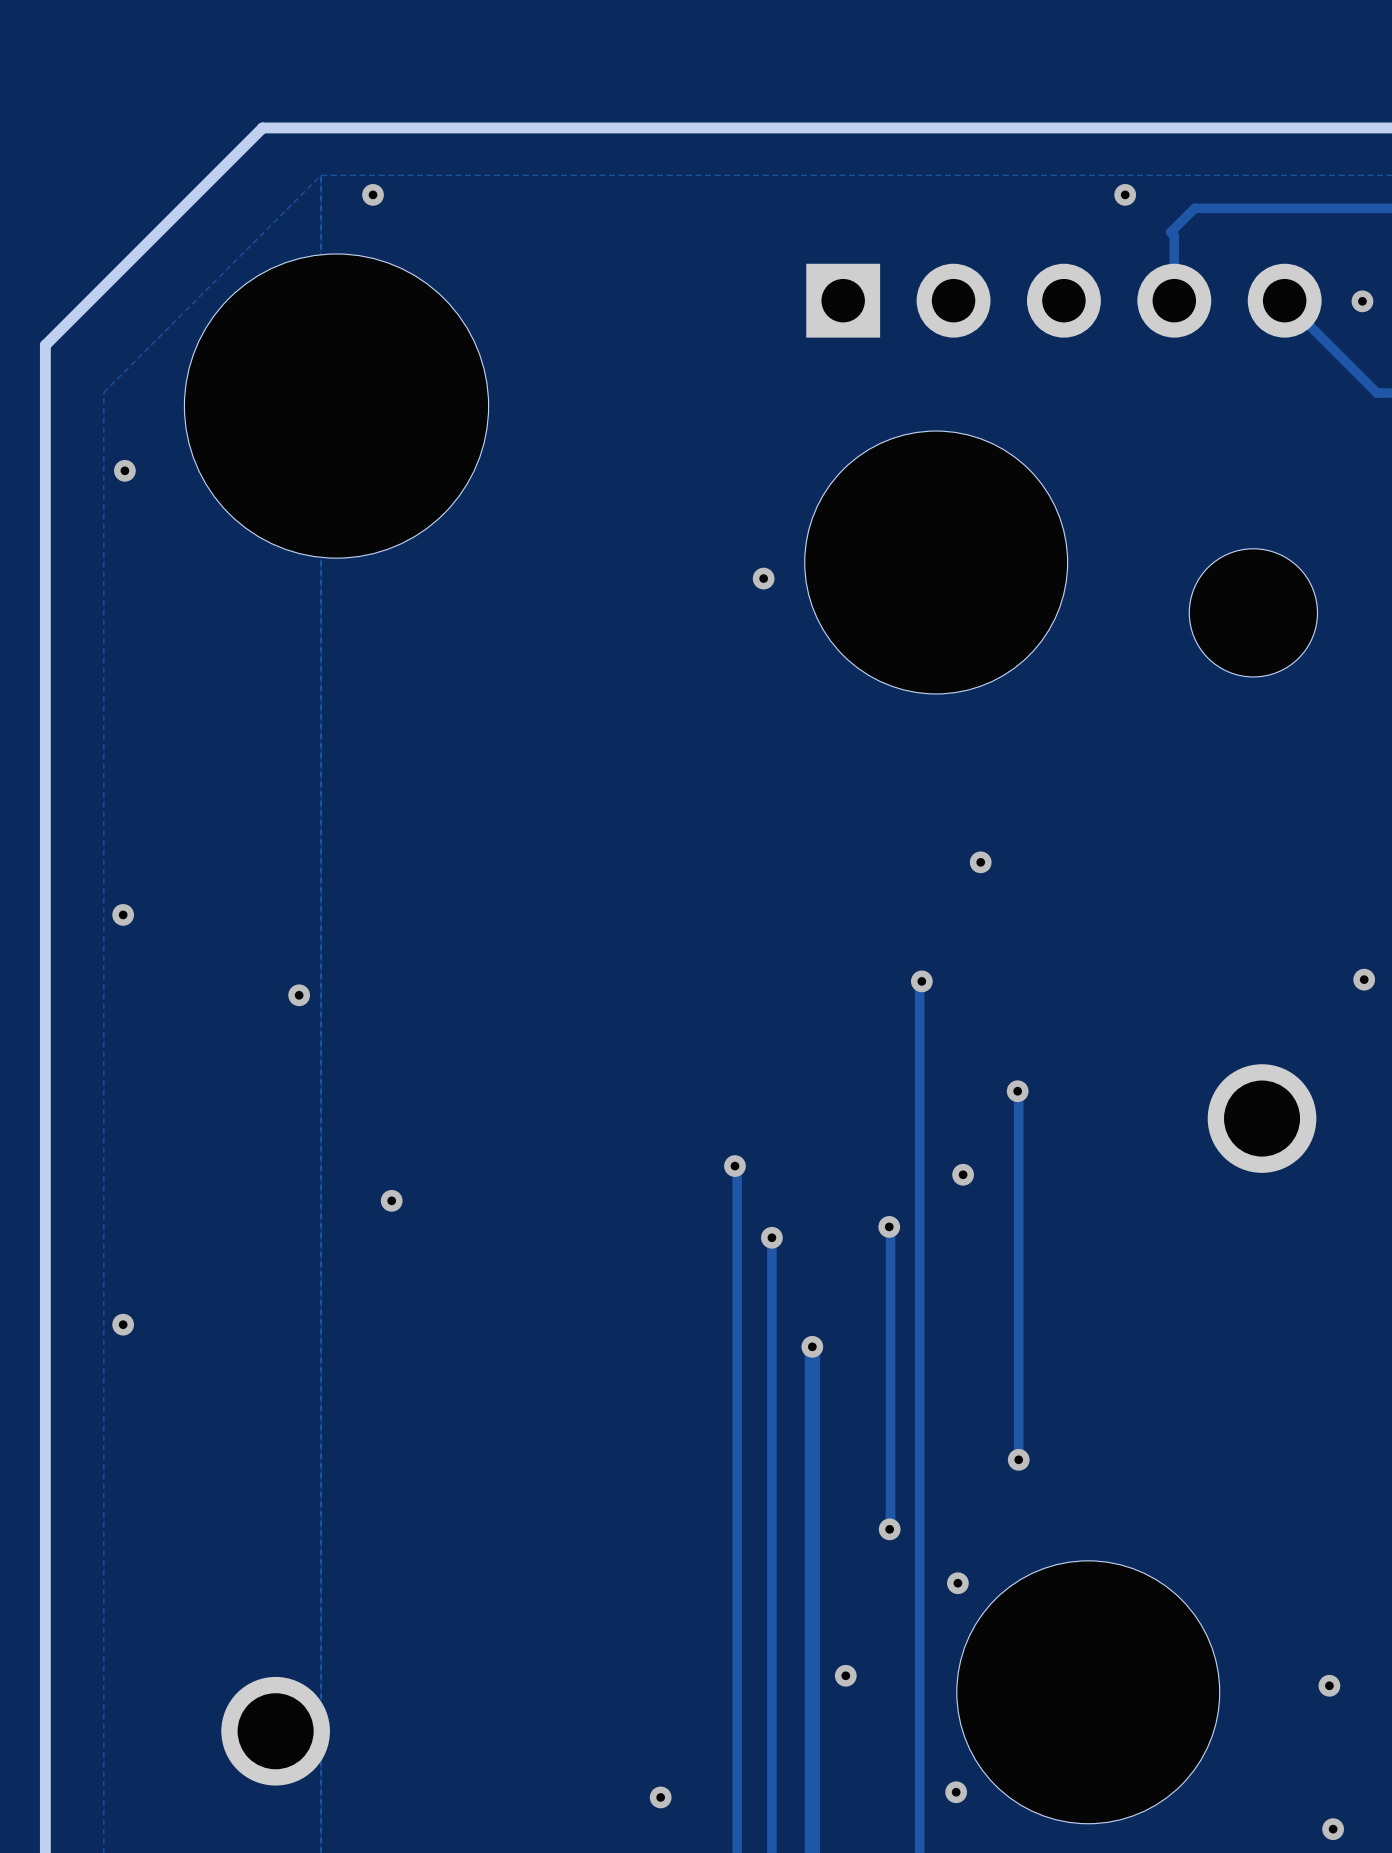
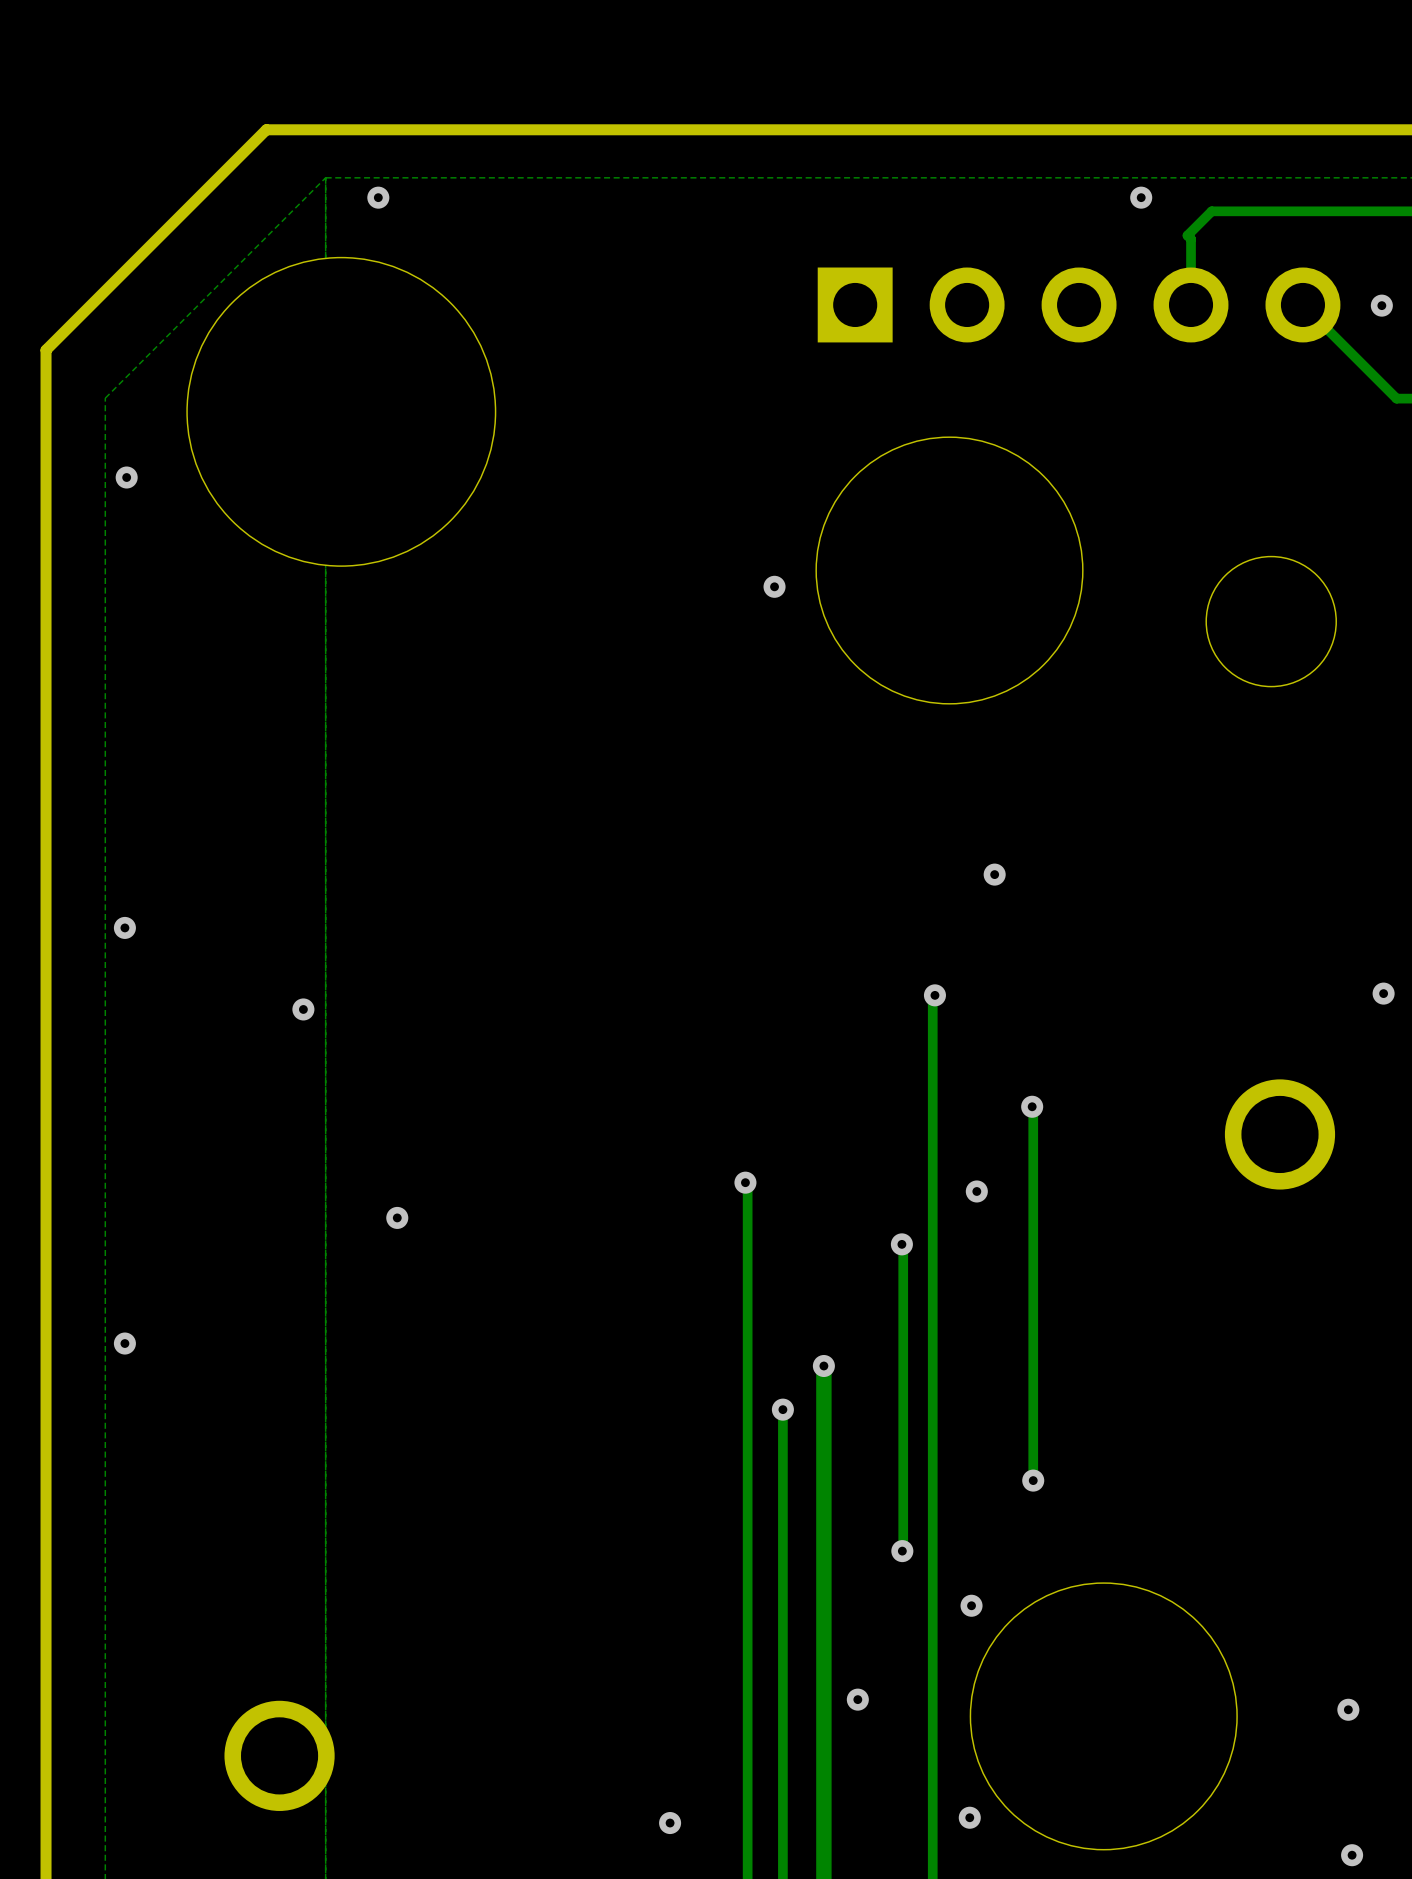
track: (771, 1237) (771, 1389) -> none
via position: (771, 1237) -> (782, 1409)

